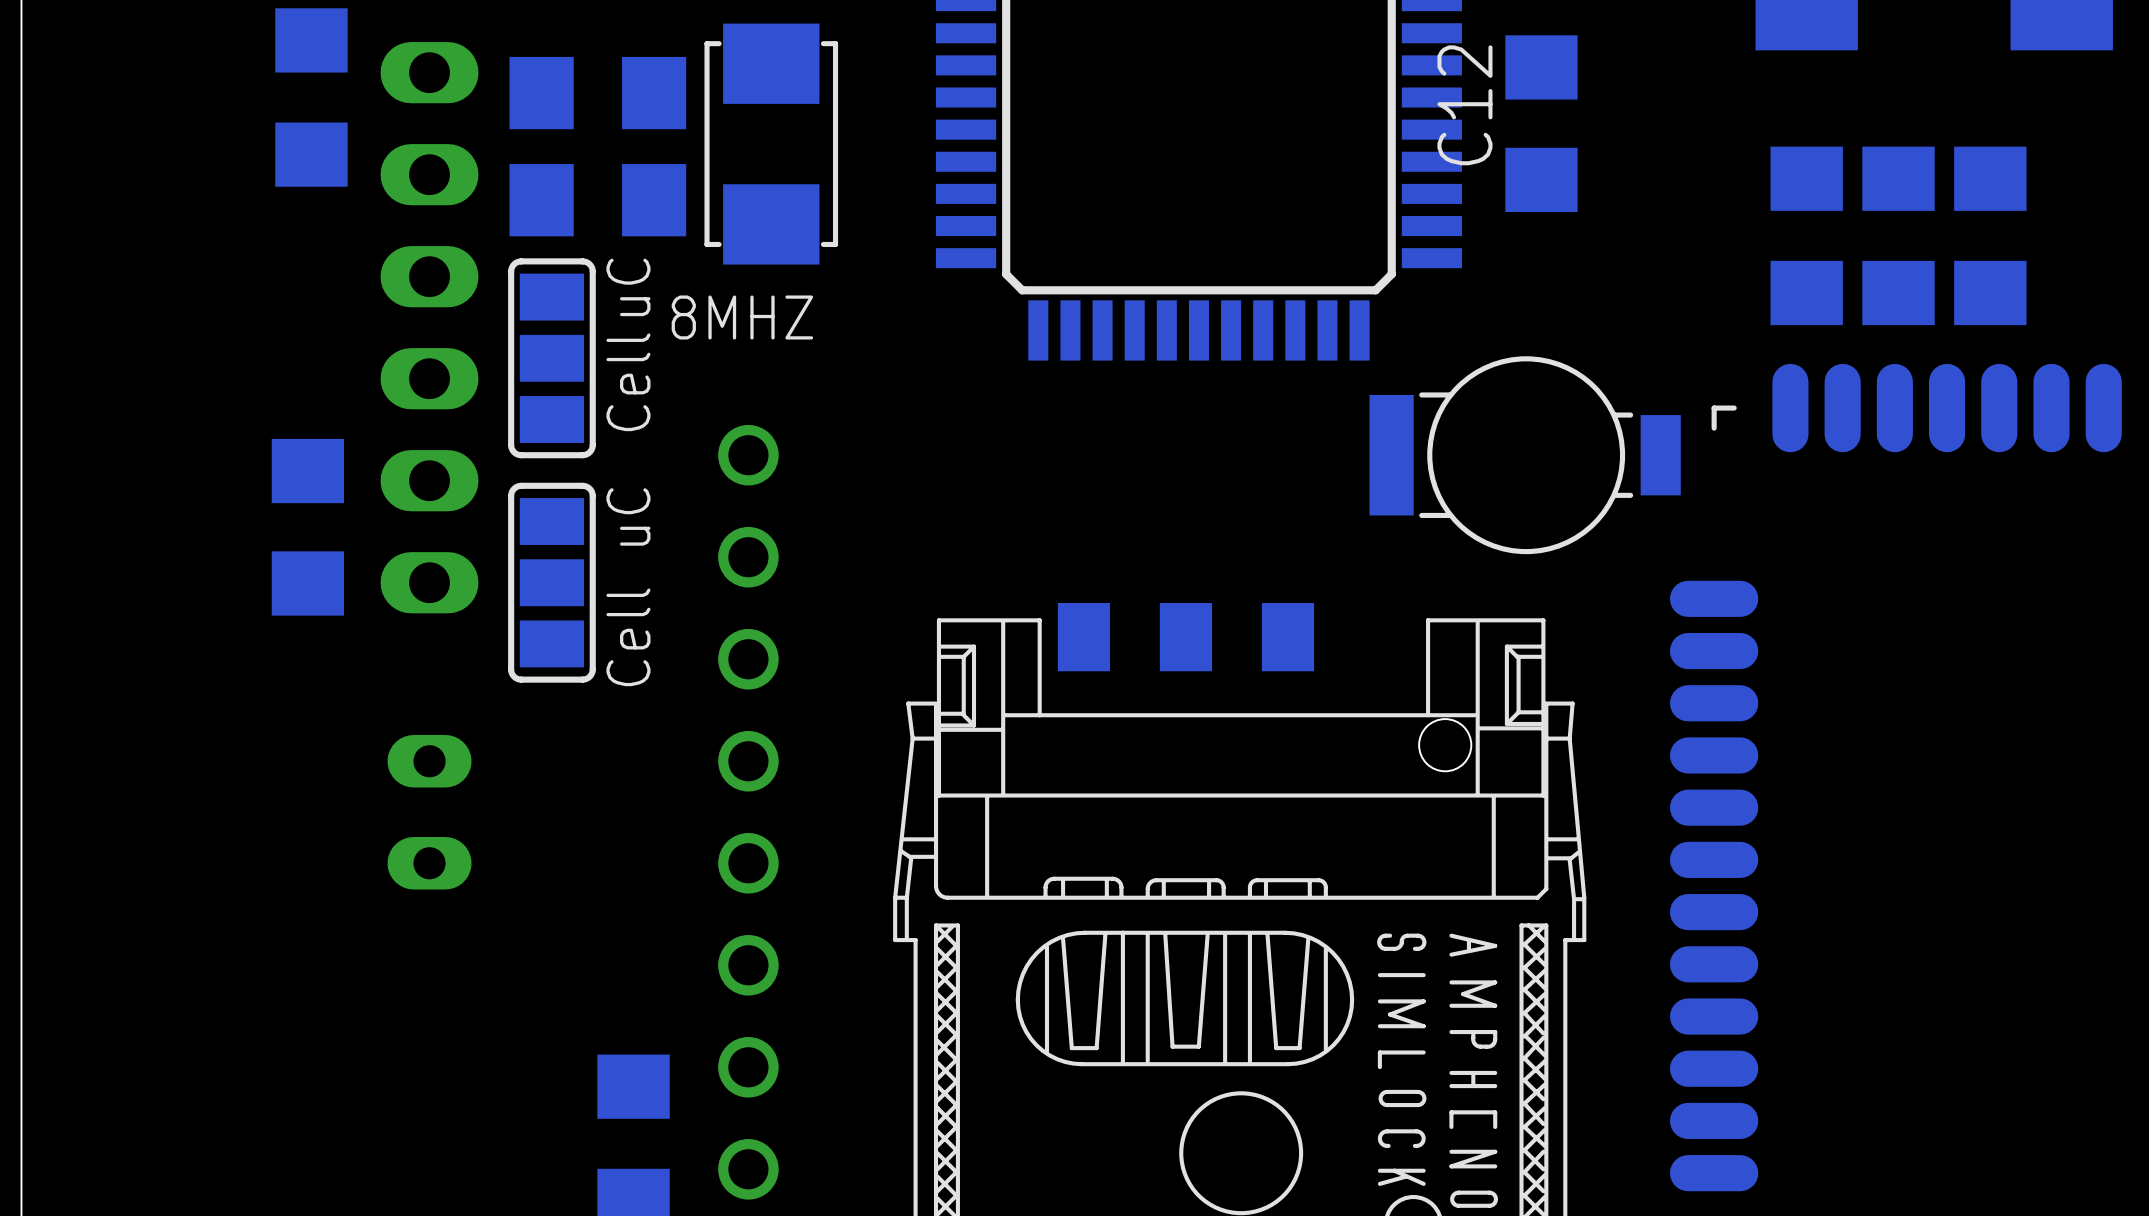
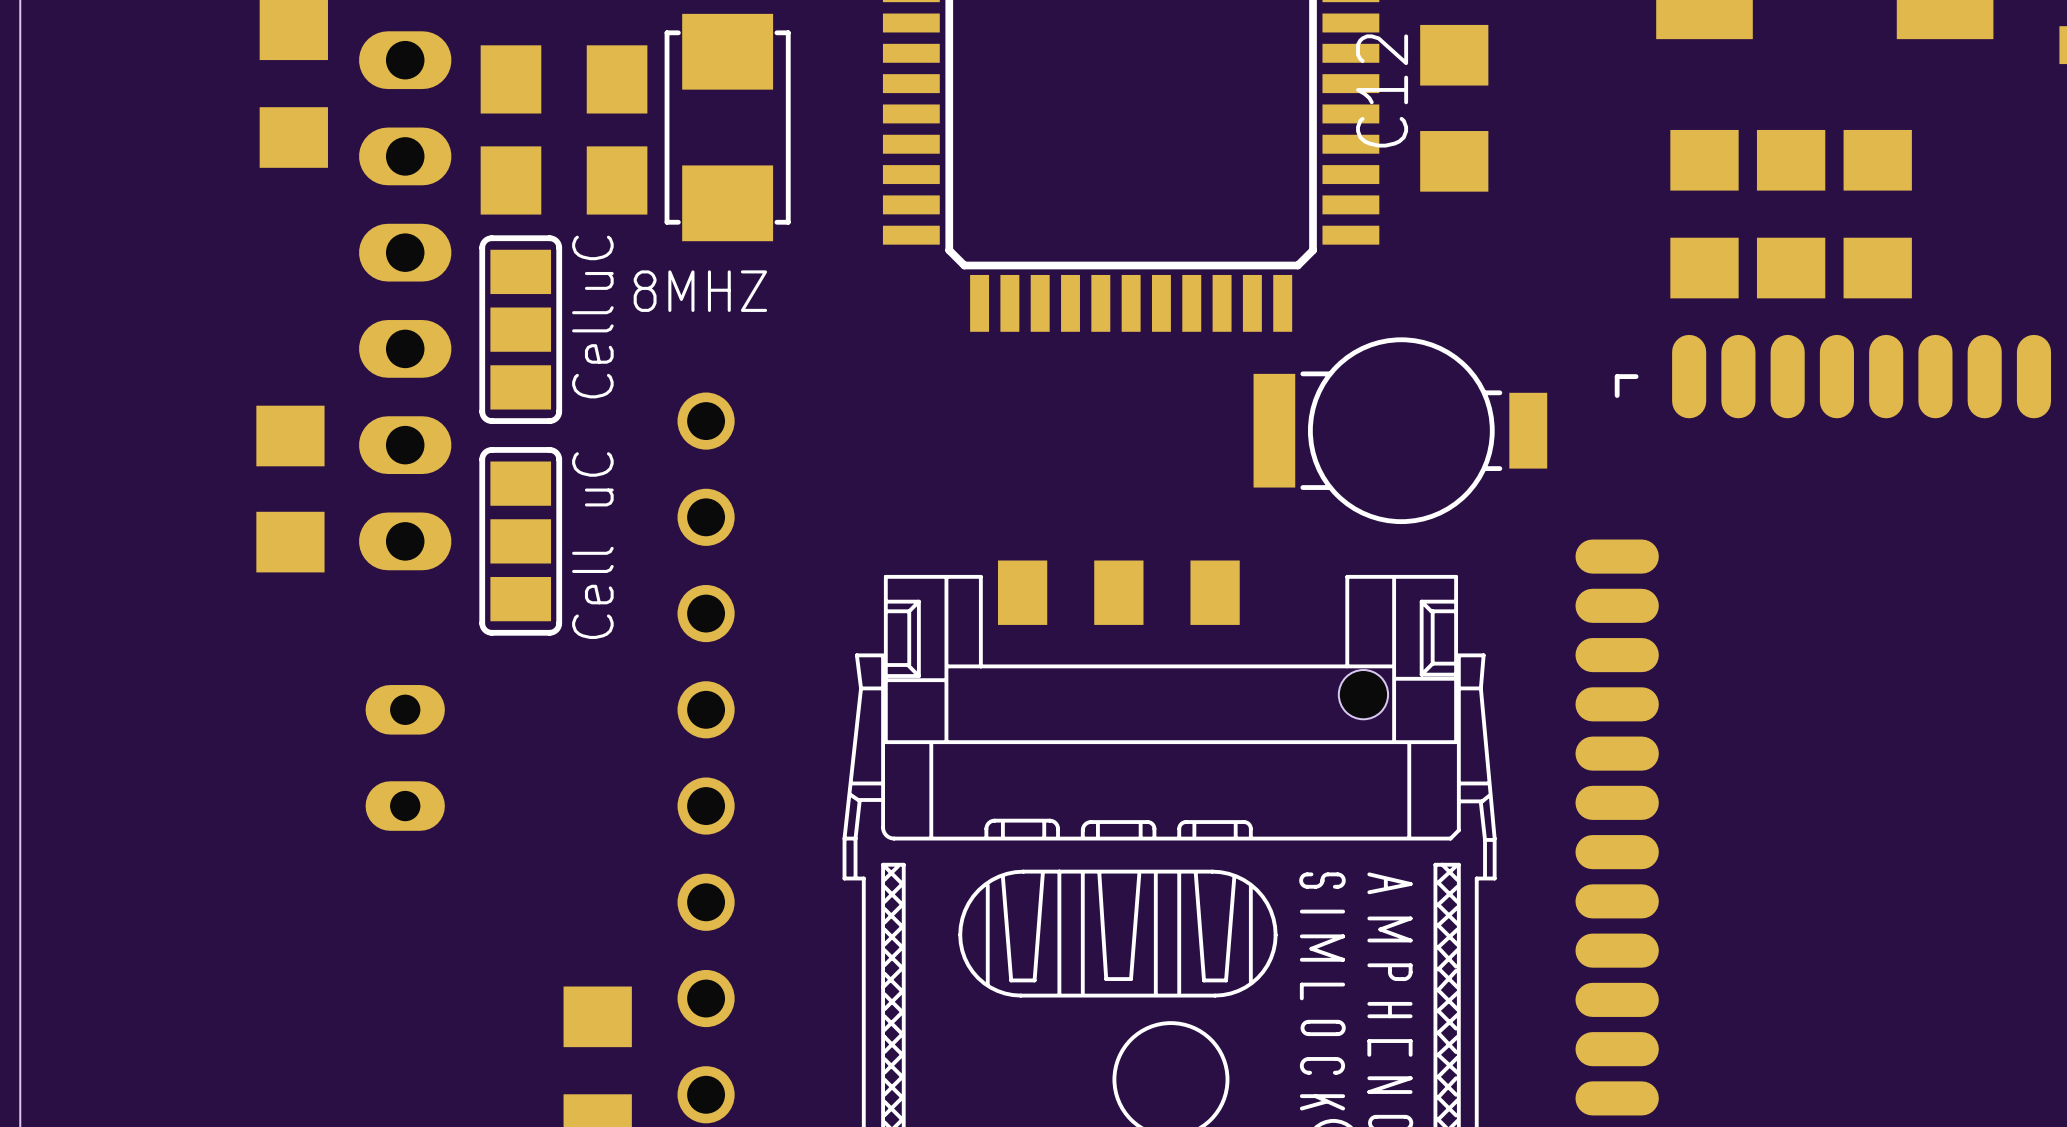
part position: (1525, 455) -> (1400, 430)

